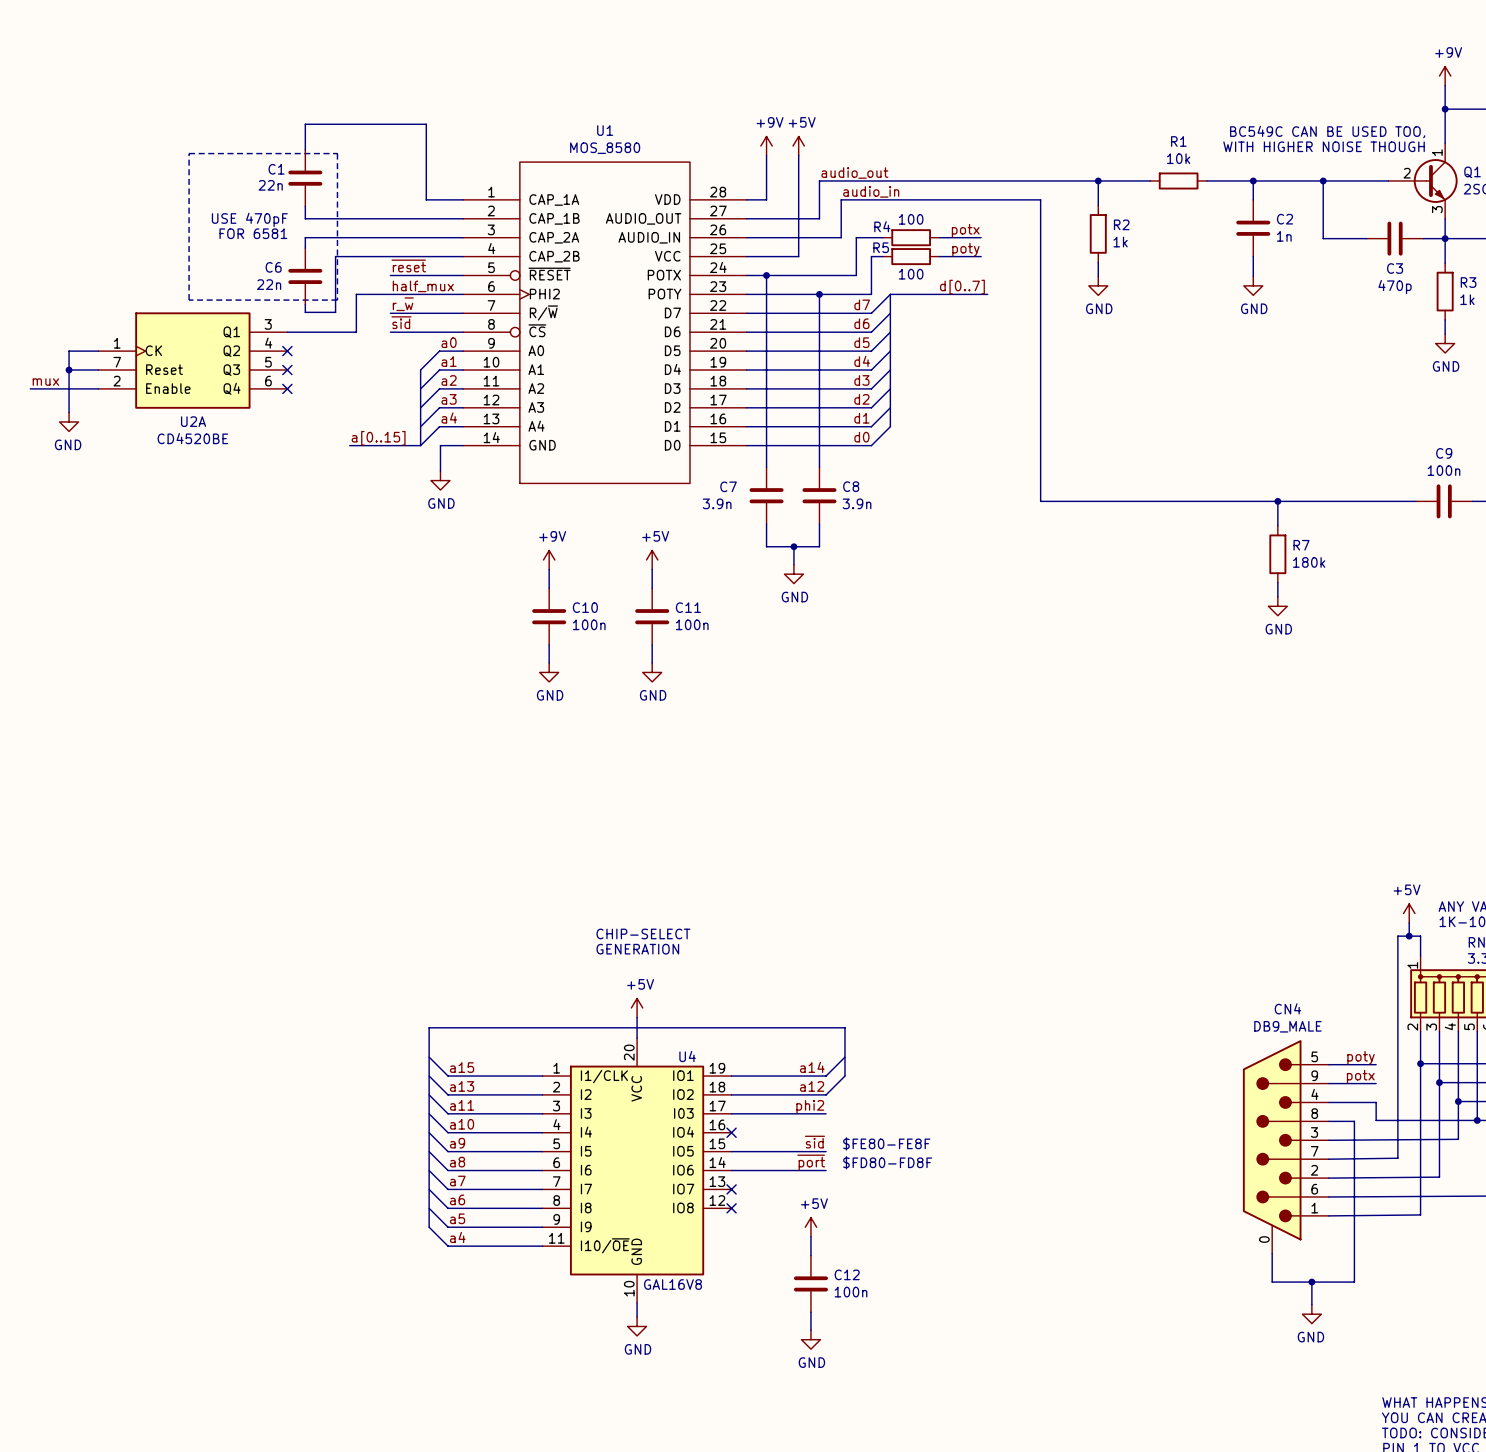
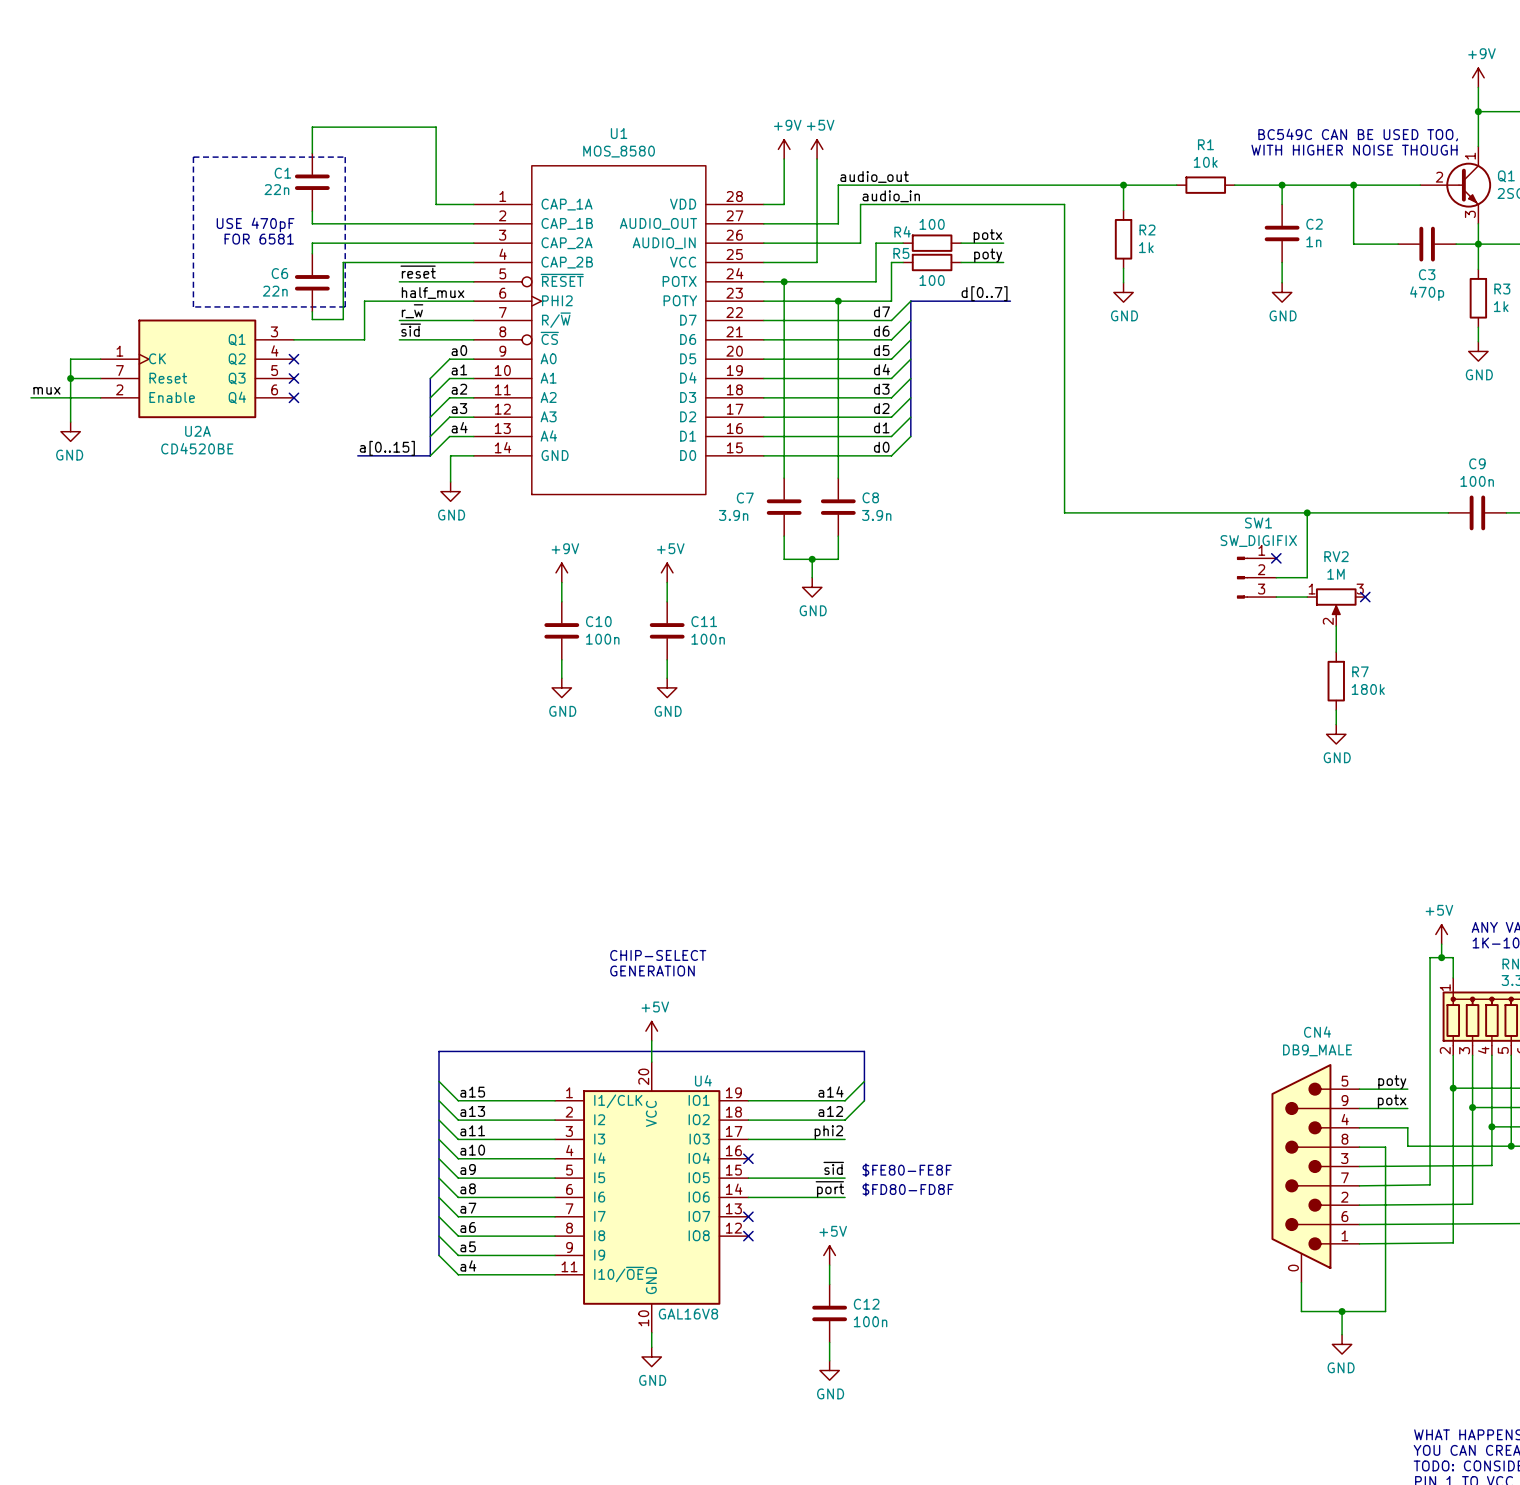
wire: none -> (1307, 538) (1307, 577) (1276, 577)
no-connect mark: none -> (1276, 558)
R7 position: (1277, 554) -> (1336, 681)
SW1: none -> SW_DIGIFIX (1256, 577)
wire: (1277, 582) (1277, 596) -> (1336, 710) (1336, 724)
wire: none -> (1276, 597) (1307, 597)
no-connect mark: none -> (1365, 597)
RV2: none -> 1M (1336, 607)
power symbol position: GND (1277, 606) -> GND (1336, 734)
wire: none -> (1336, 626) (1336, 652)

